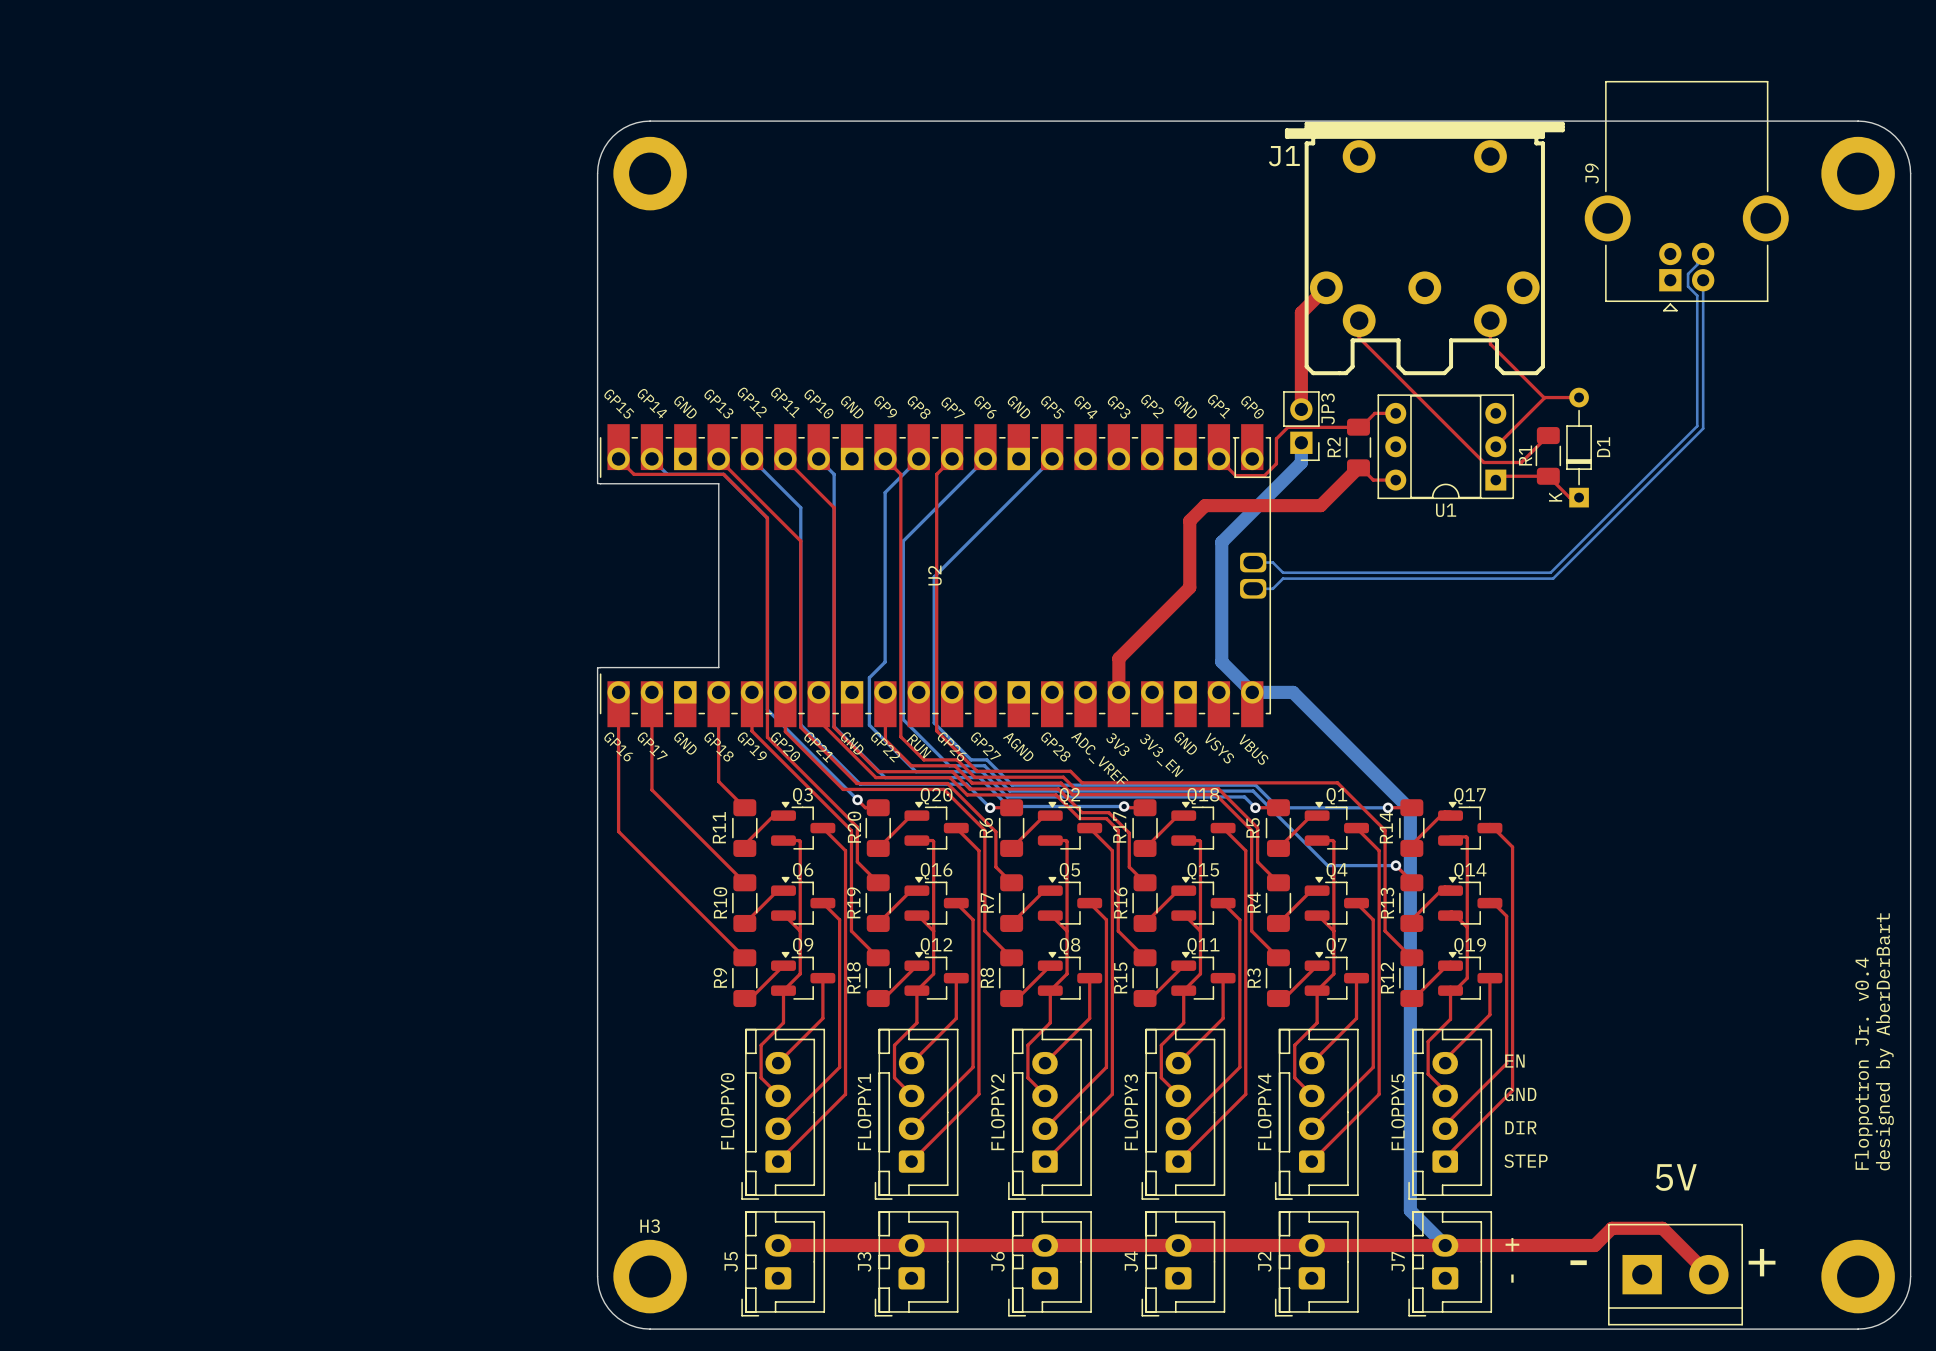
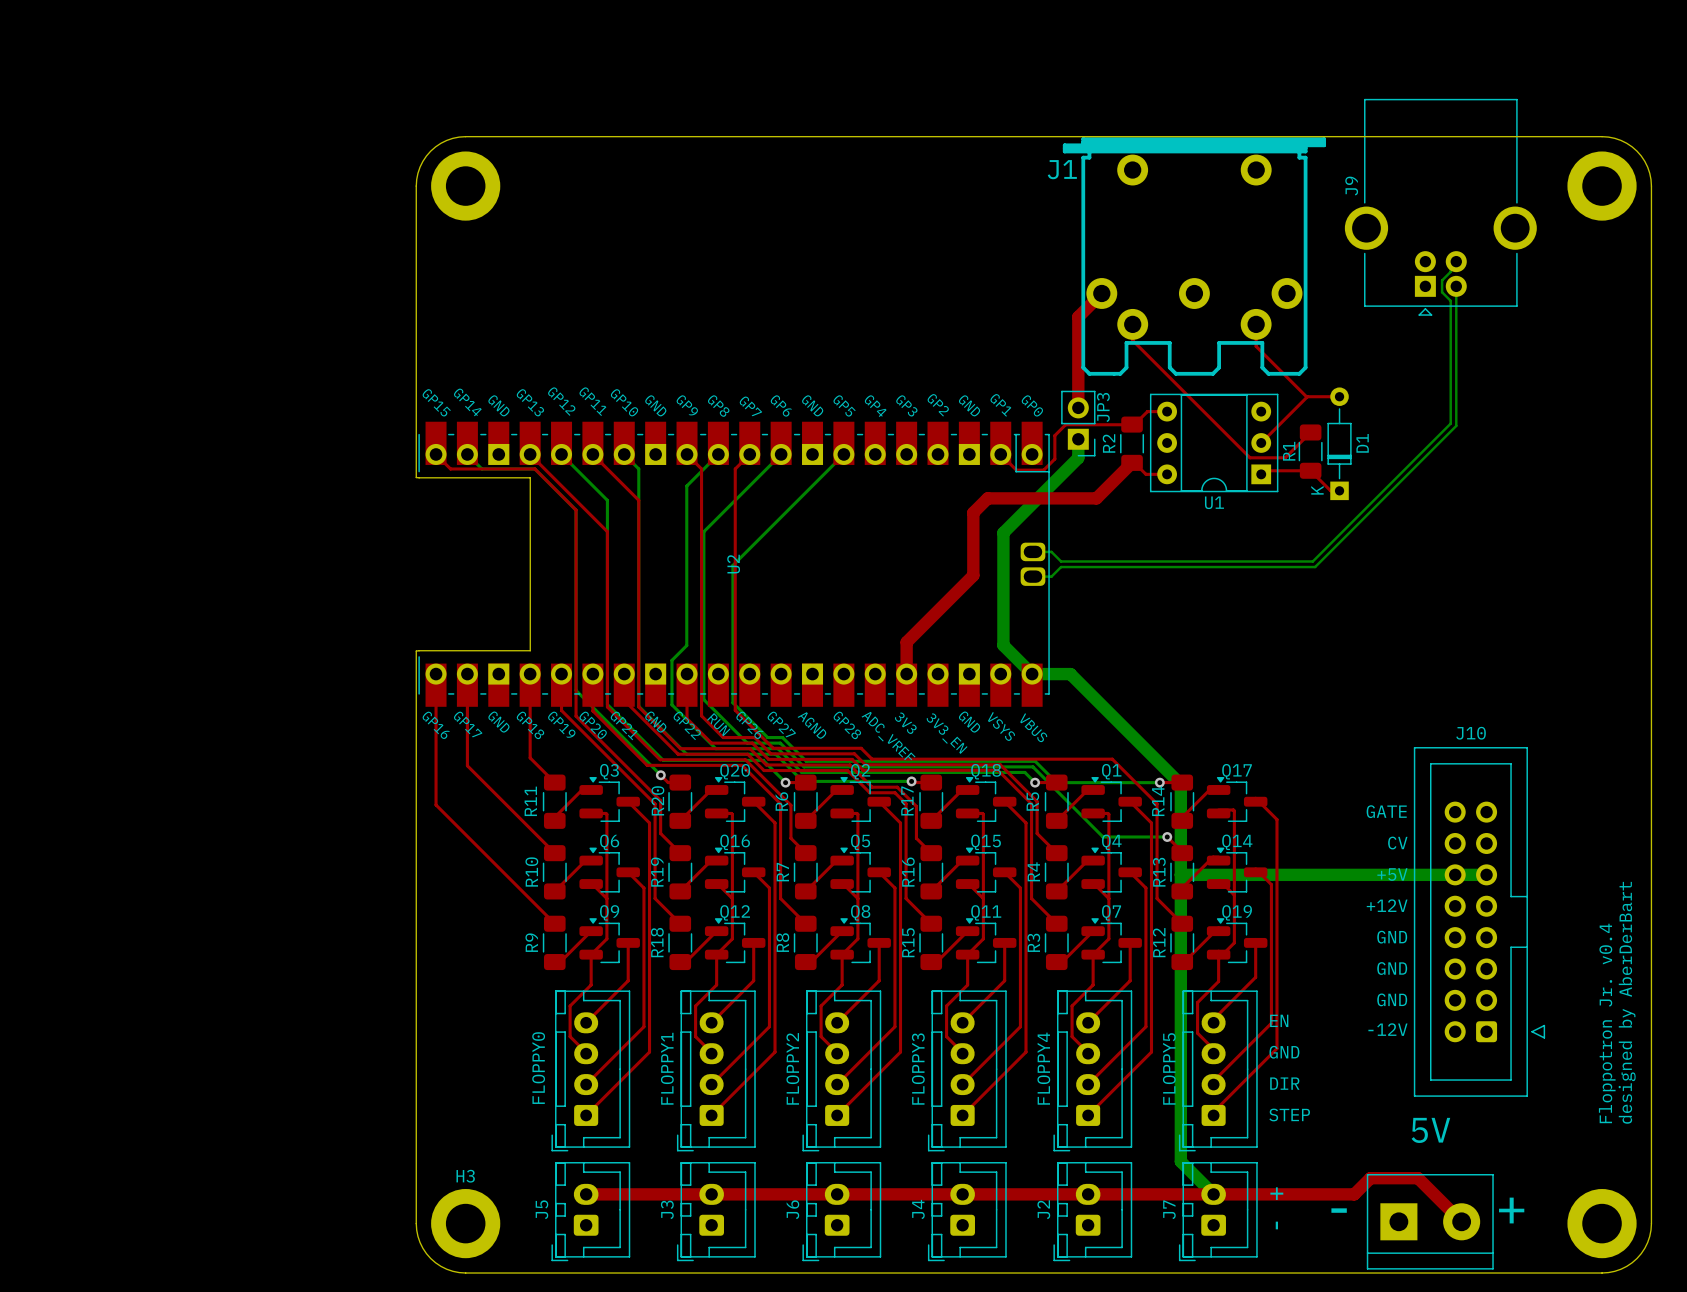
bottom track: none -> (1180, 874) (1486, 874)
J10: none -> (1479, 921)

